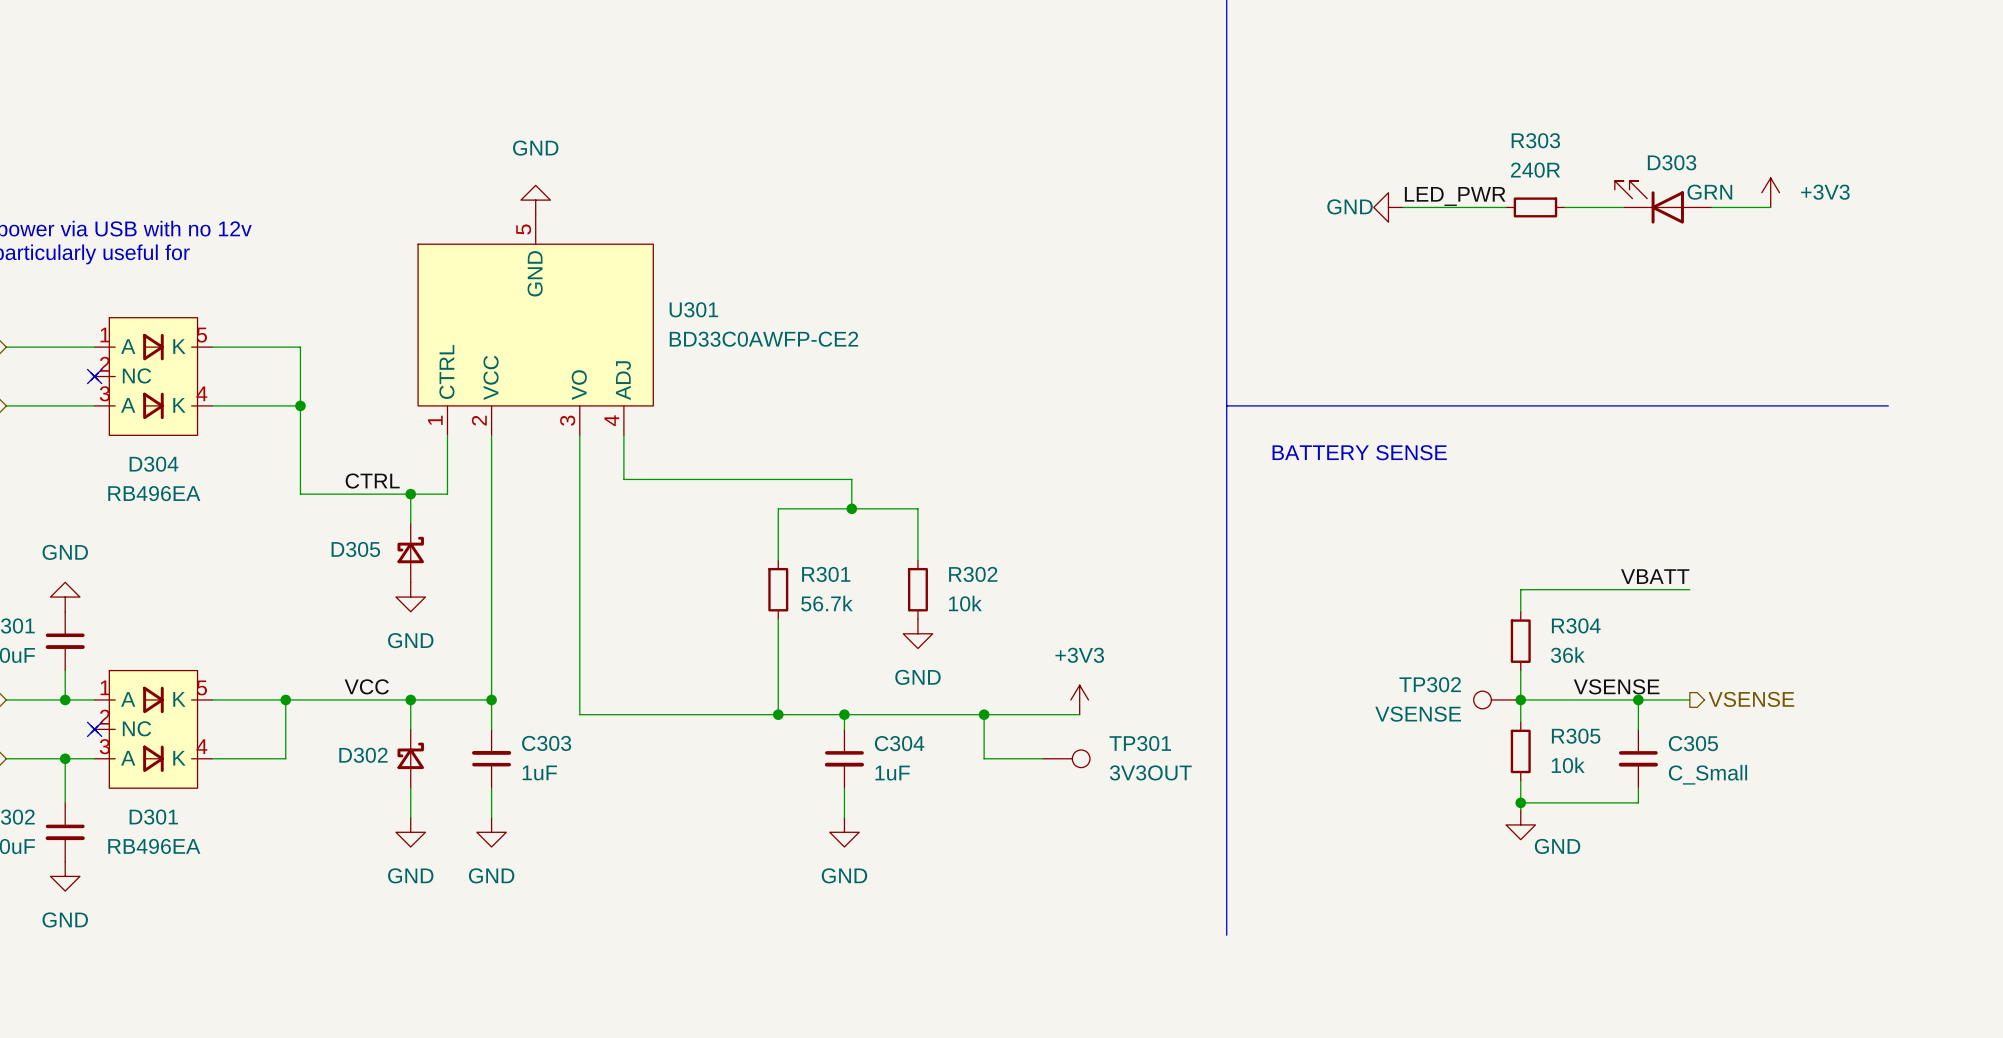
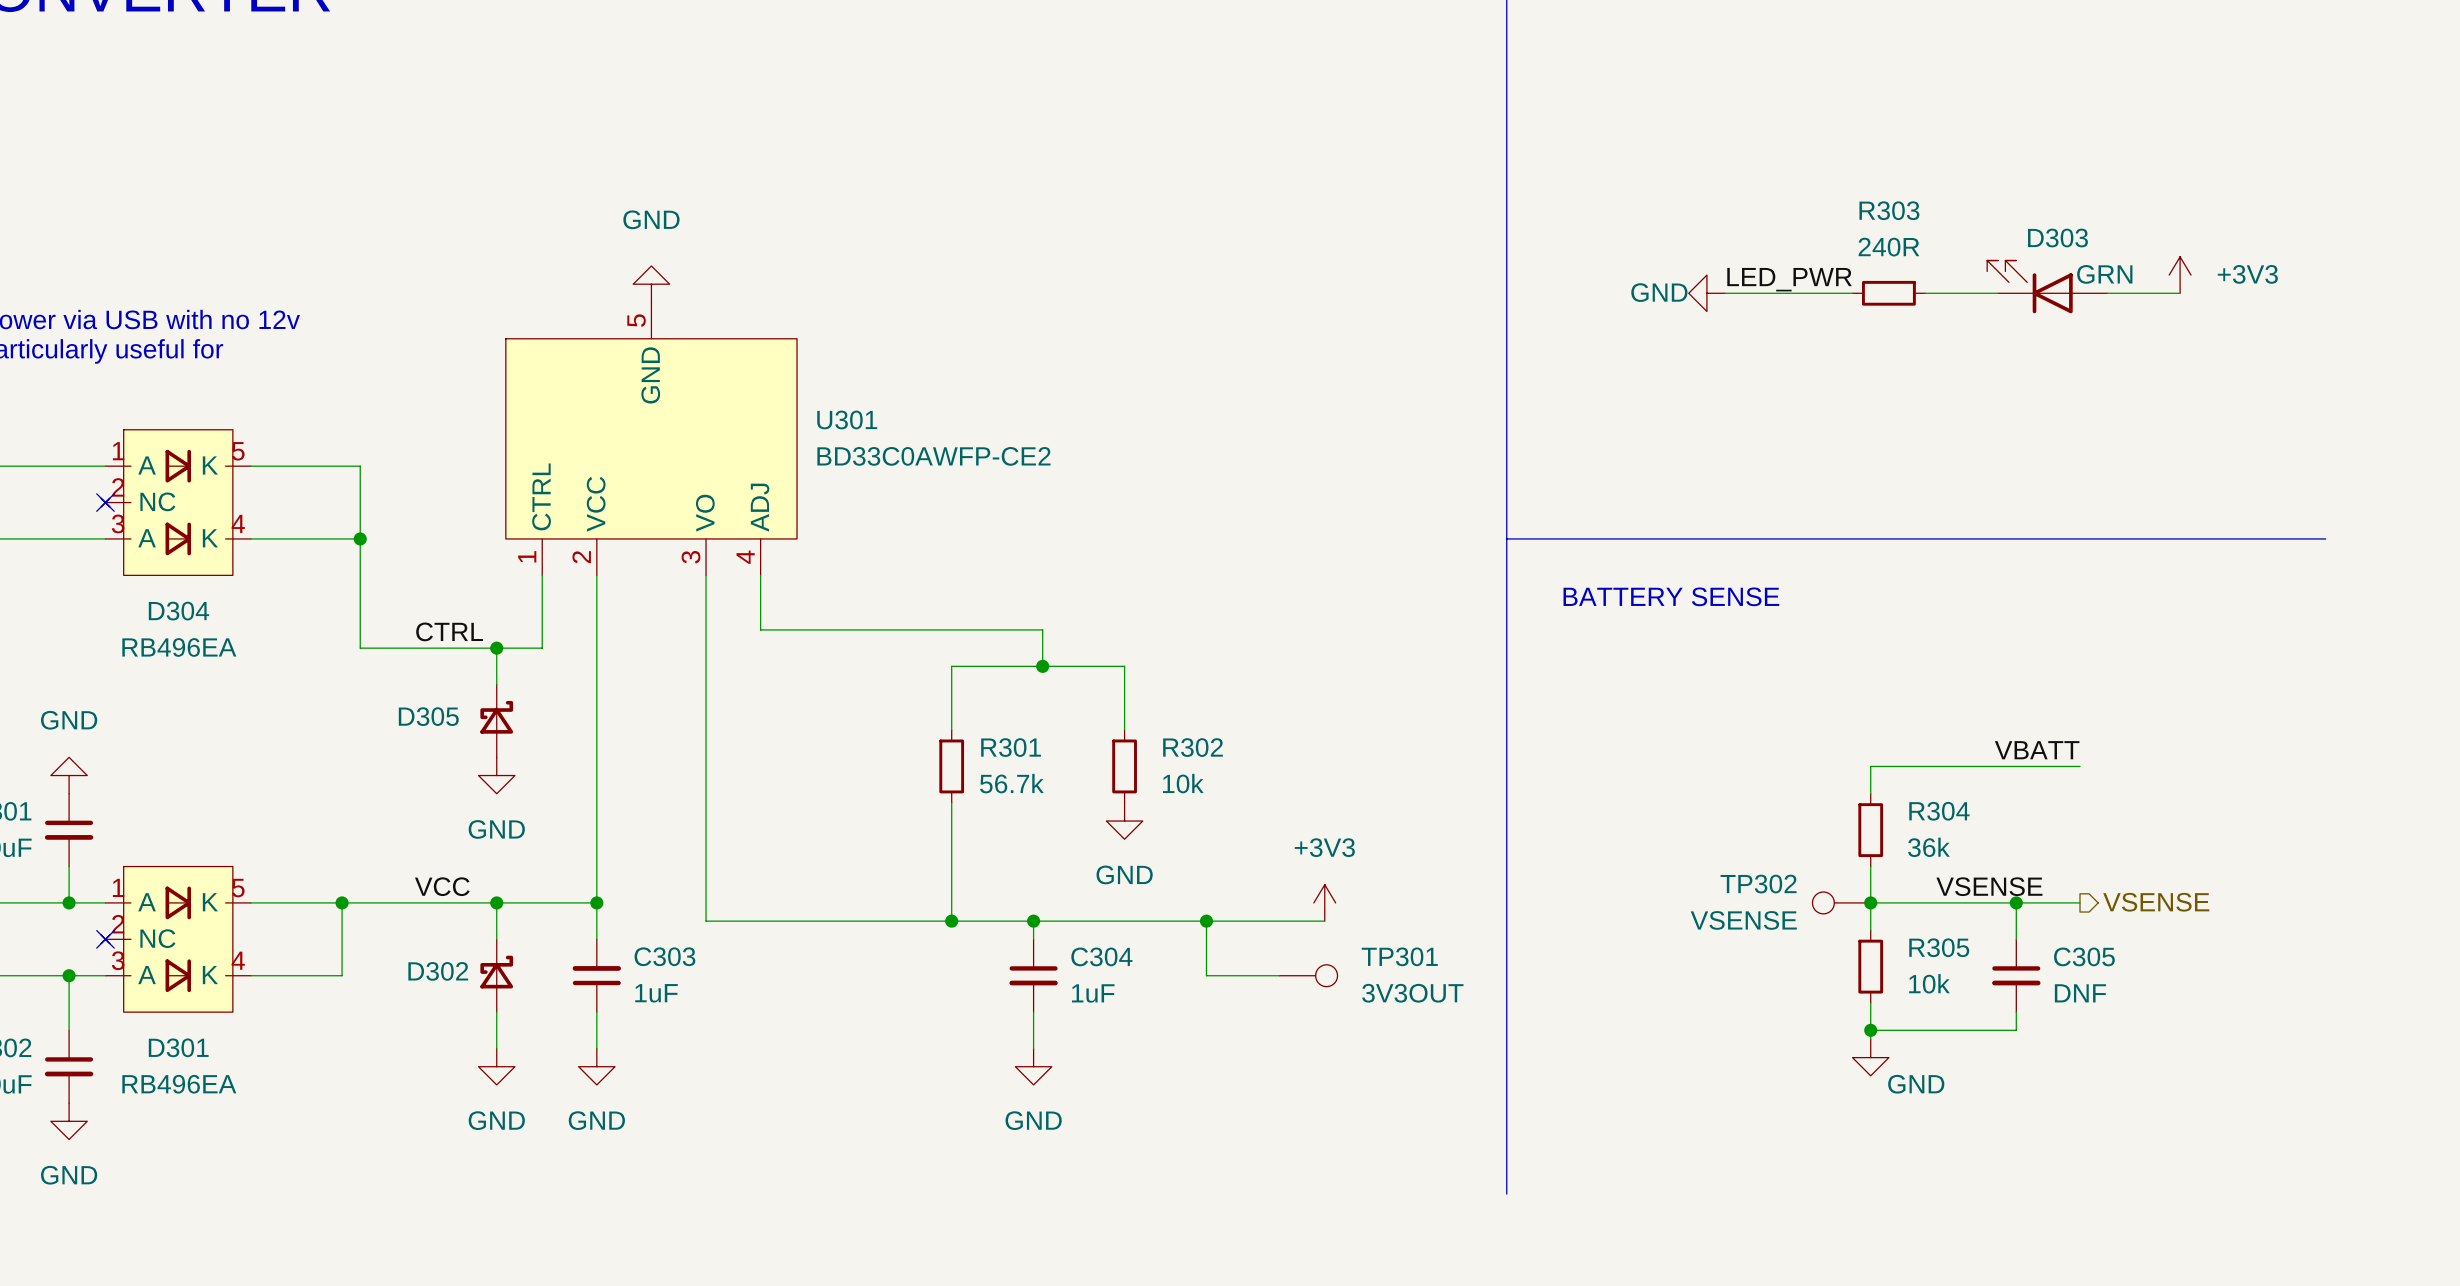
C305 value: C_Small (1707, 774) -> DNF (2080, 993)

